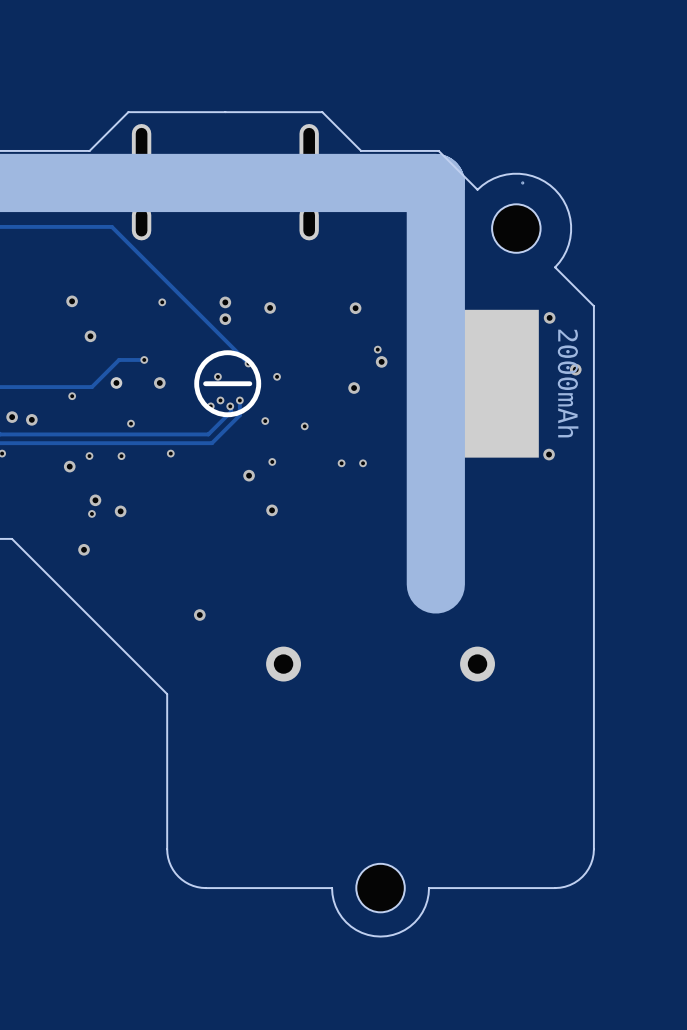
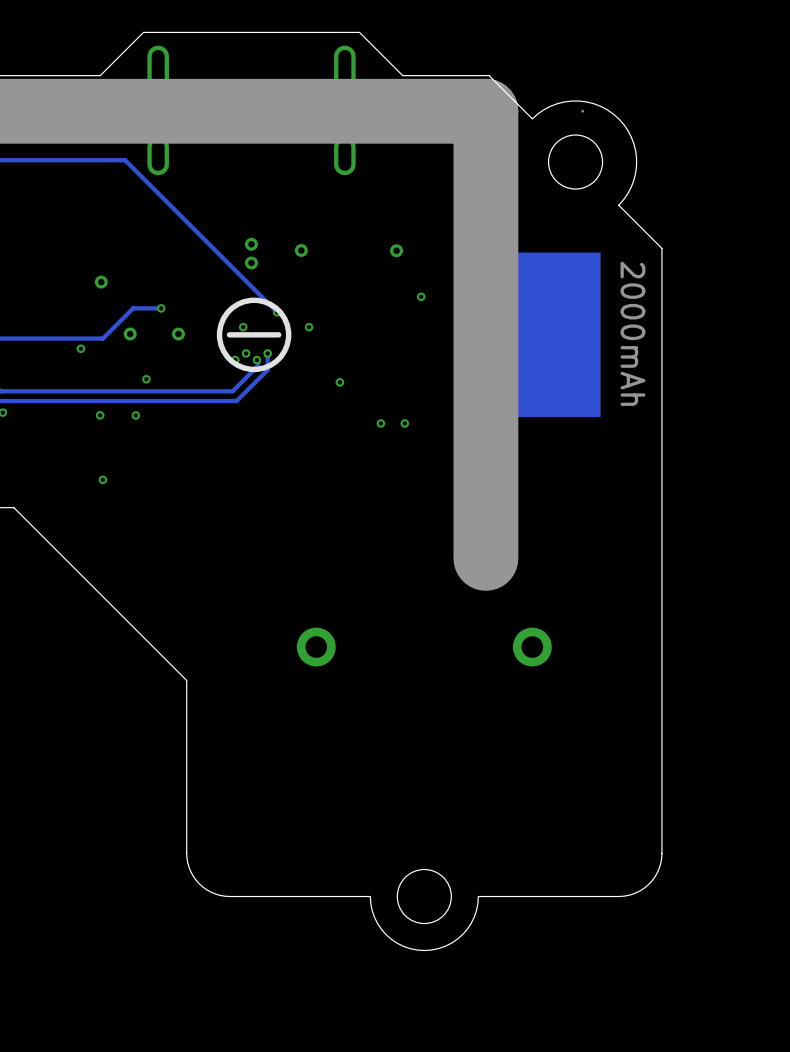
via: (72, 301) -> none
via: (162, 302) -> none
via: (549, 317) -> none
via: (381, 361) -> none
via: (575, 369) -> none
via: (354, 388) -> none
via: (12, 417) -> none
via: (31, 419) -> none
via: (265, 421) -> none
via: (170, 453) -> none
via: (549, 454) -> none
via: (272, 461) -> none
via: (69, 466) -> none
via: (249, 475) -> none
via: (95, 500) -> none
via: (272, 510) -> none
via: (120, 511) -> none
via: (84, 549) -> none
via: (199, 614) -> none

